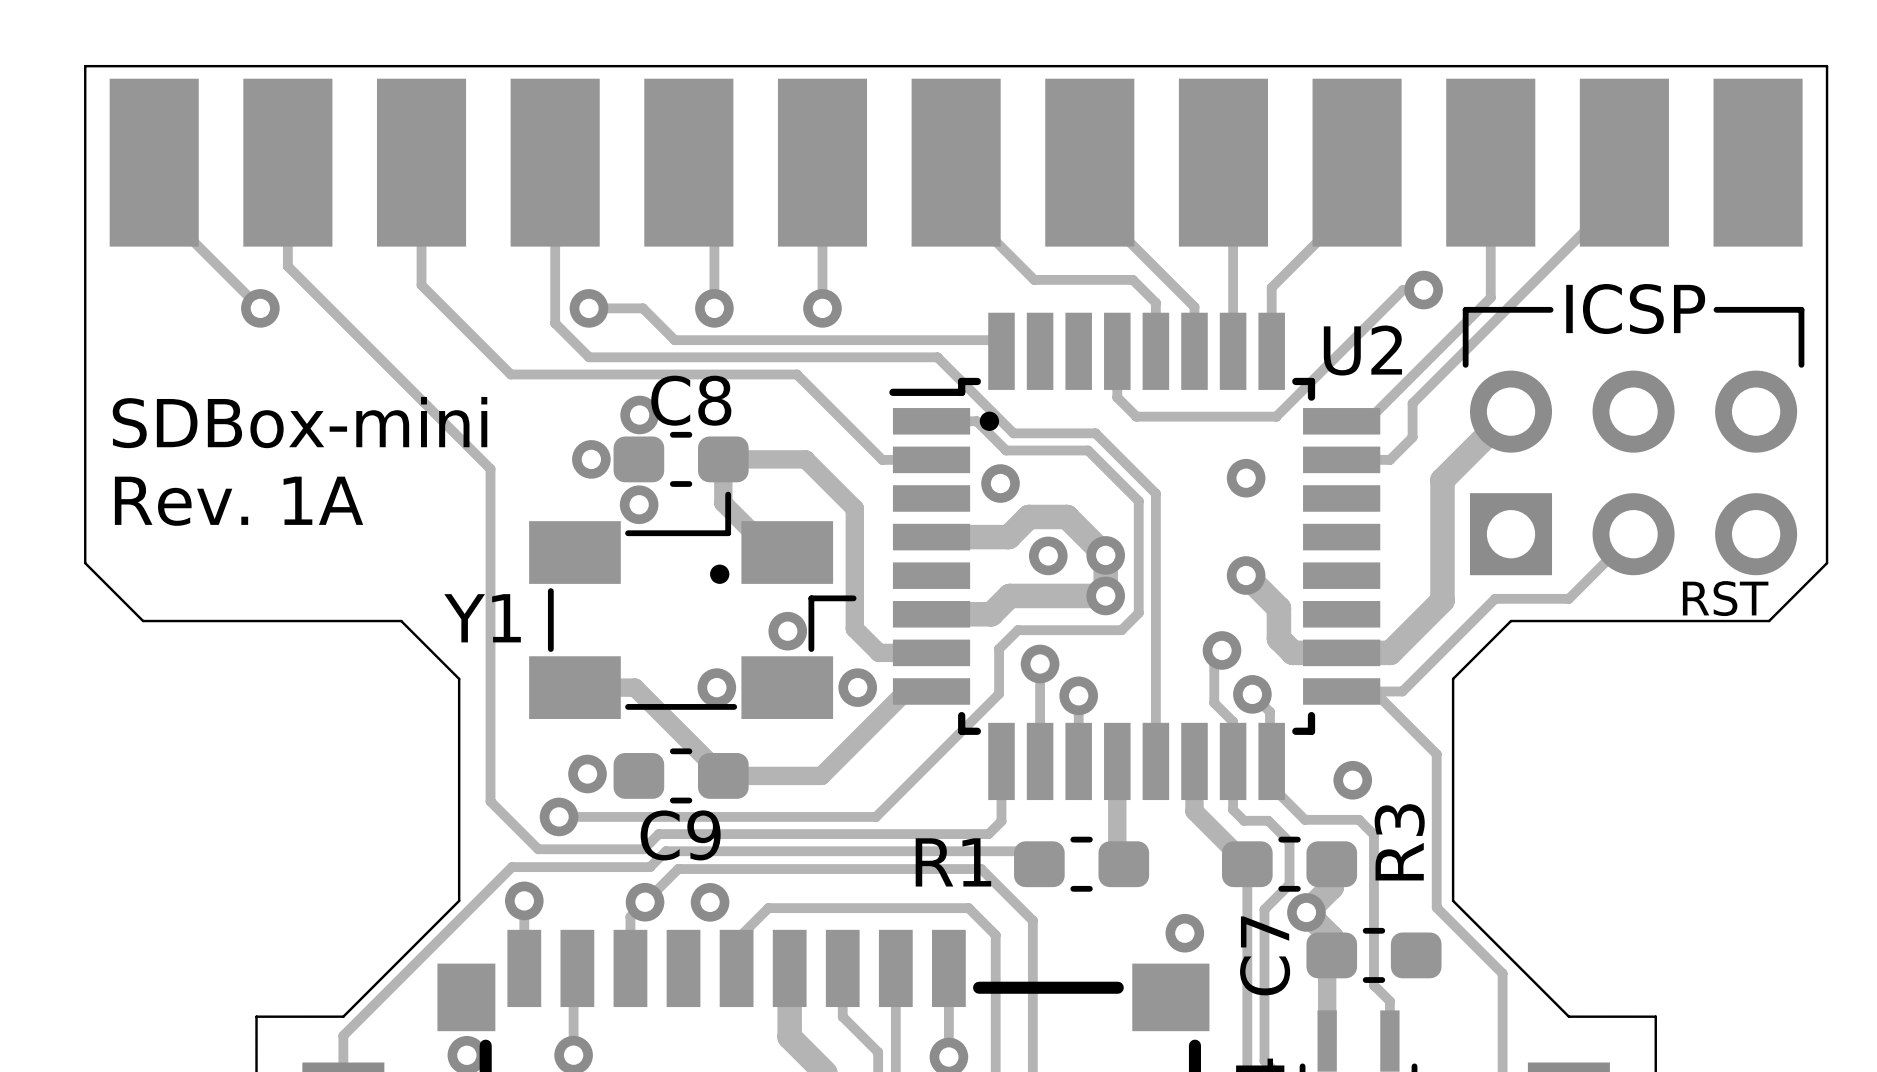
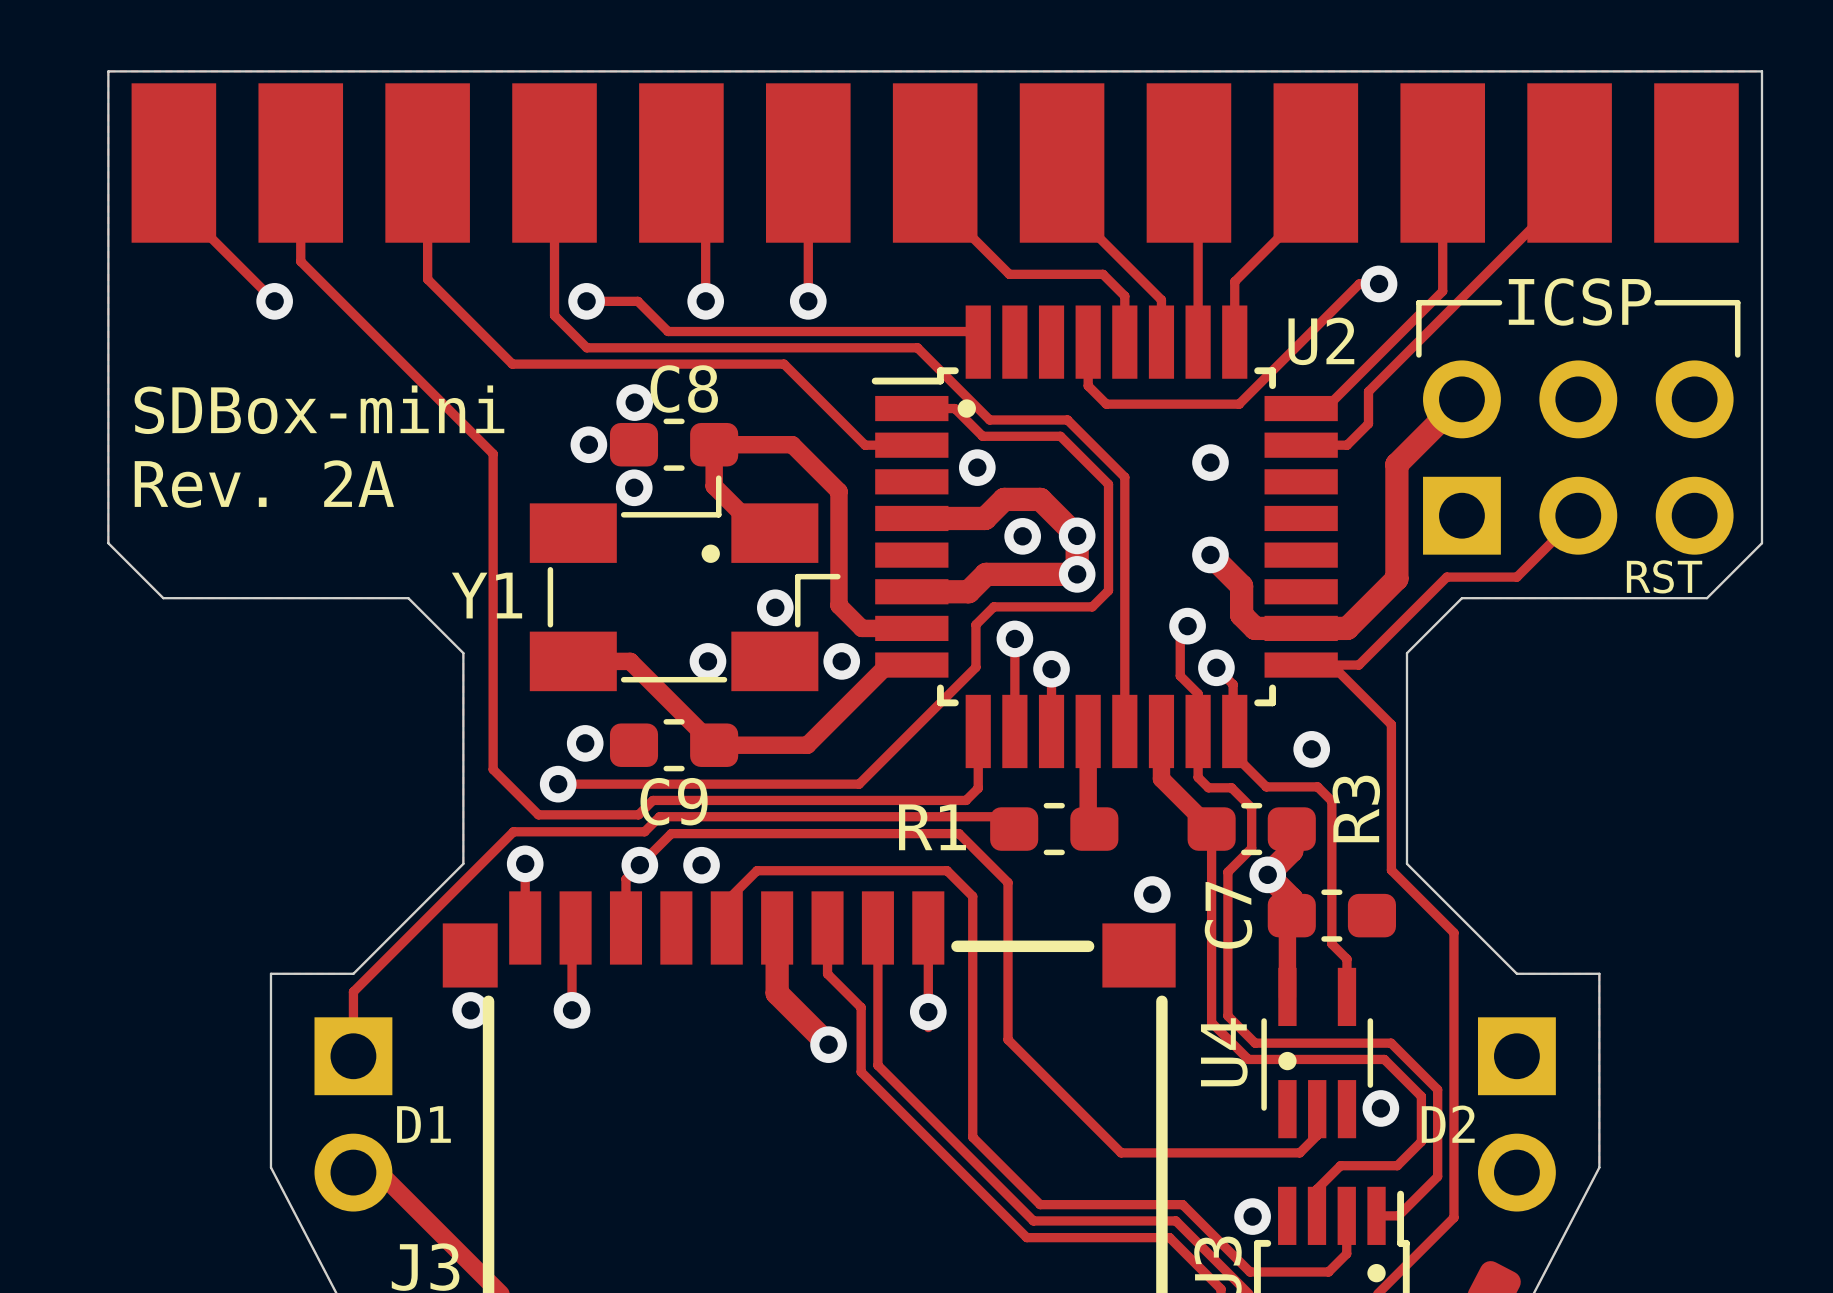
text: Rev. 1A (239, 501) -> Rev. 2A (264, 484)

